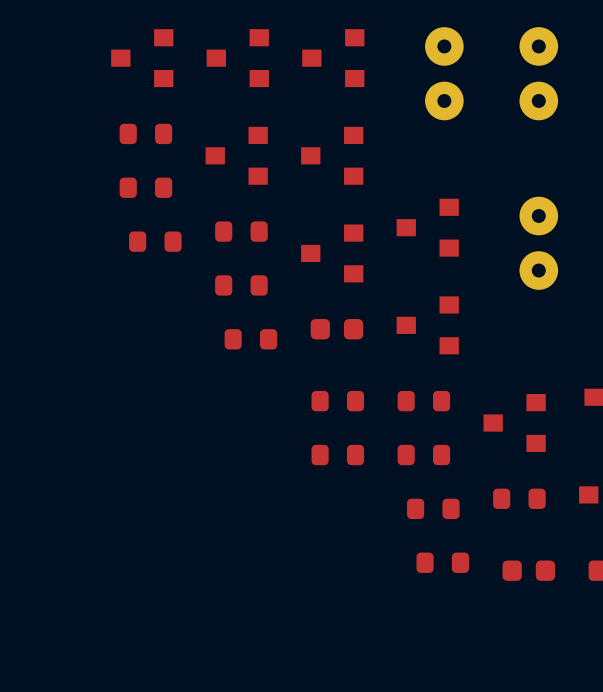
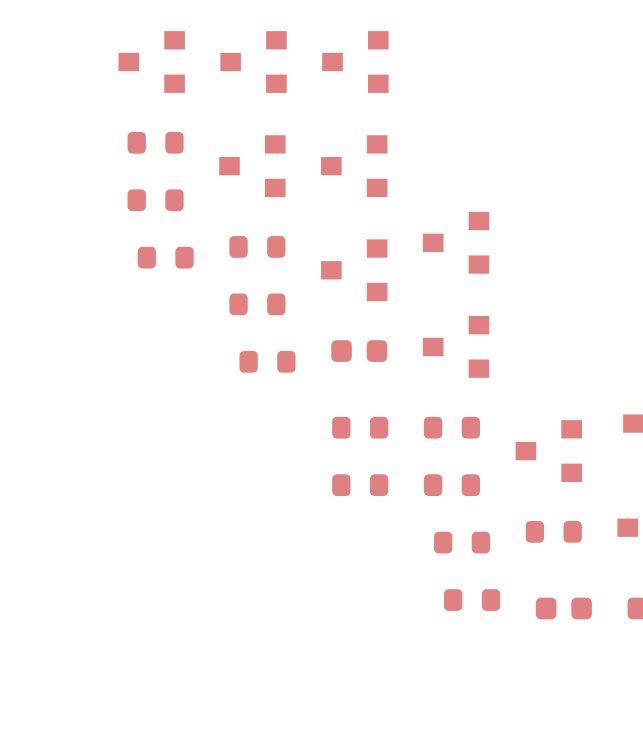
part: (444, 73) -> none
part: (538, 73) -> none
part: (538, 243) -> none

